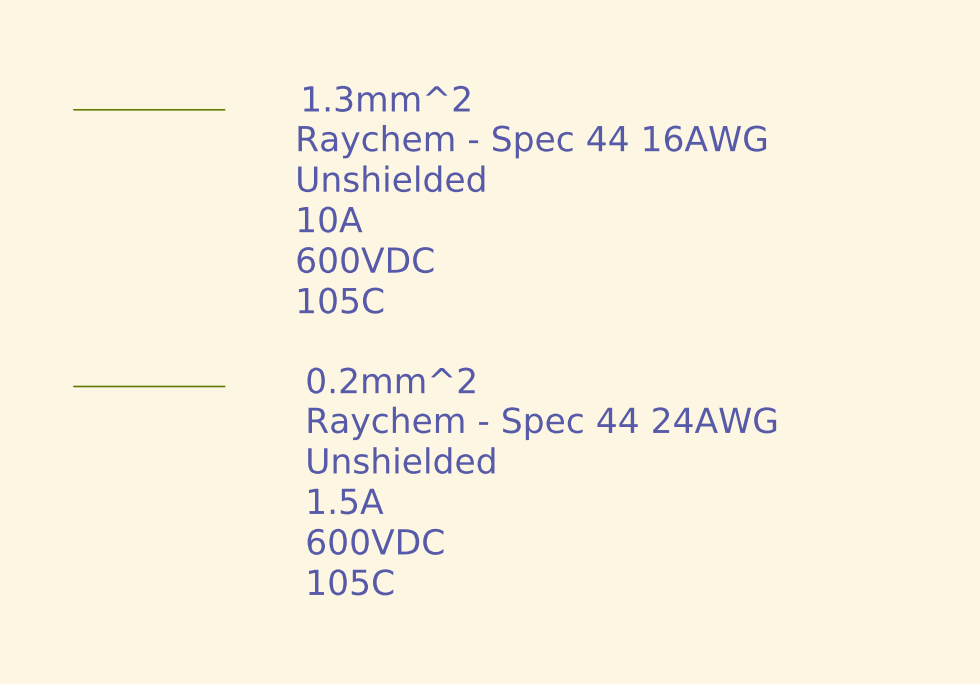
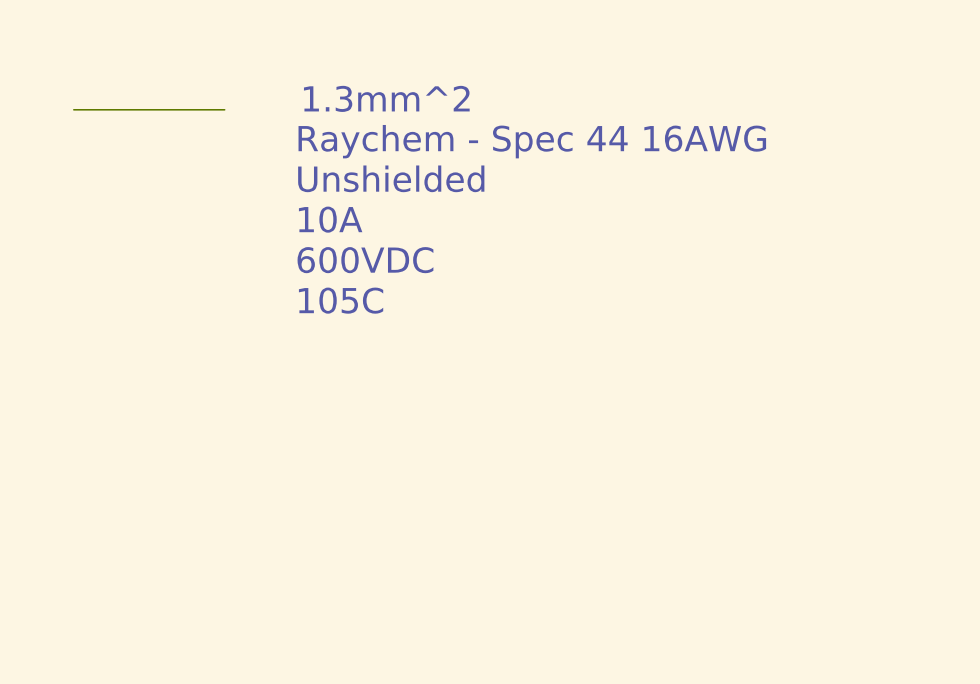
text: 0.2mm^2 (391, 380) -> none
wire: (73, 386) (224, 386) -> none
text: Raychem - Spec 44 24AWG (542, 423) -> none
text: Unshielded (401, 460) -> none
text: 1.5A (346, 501) -> none
text: 600VDC (375, 541) -> none
text: 105C (351, 582) -> none

